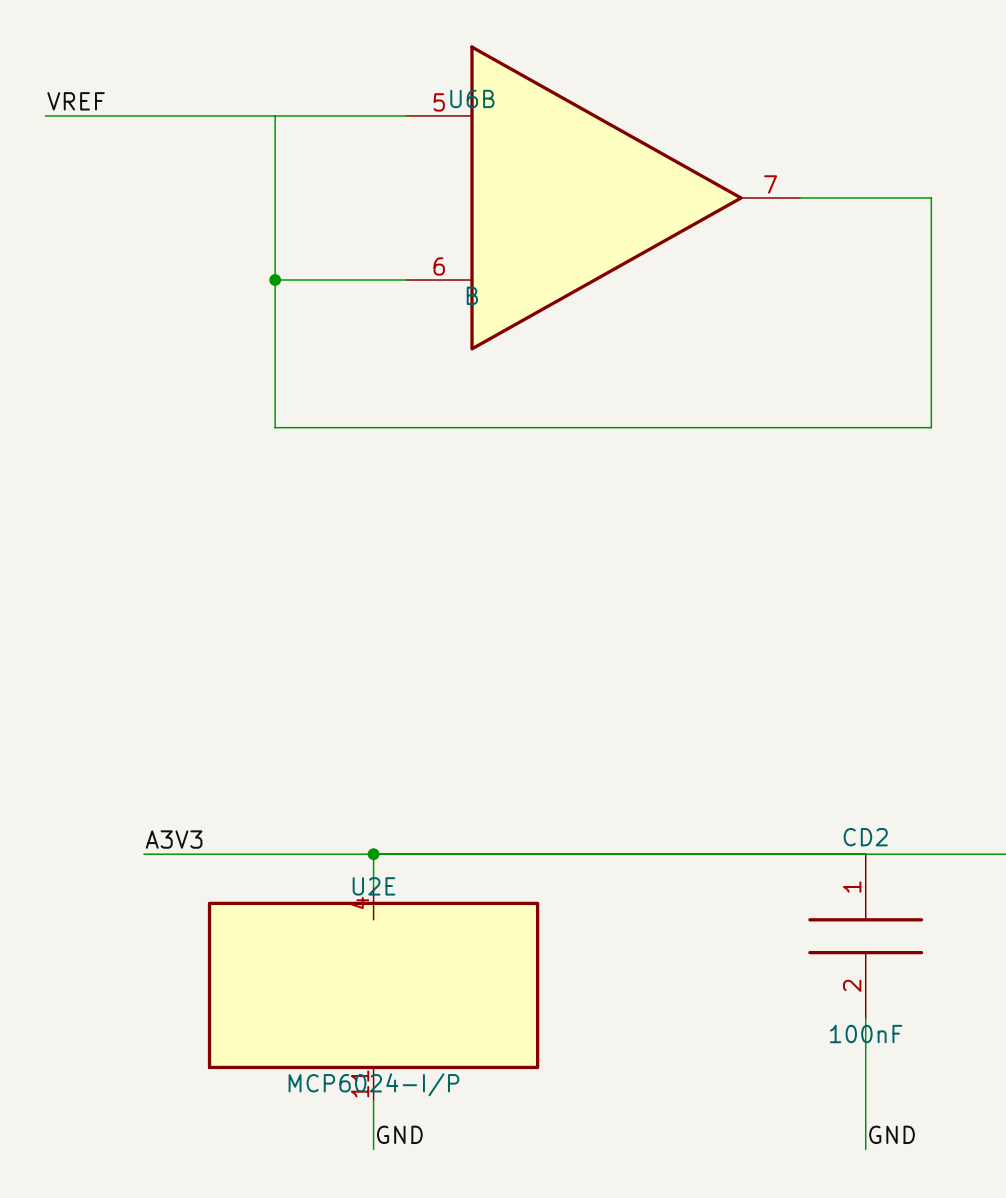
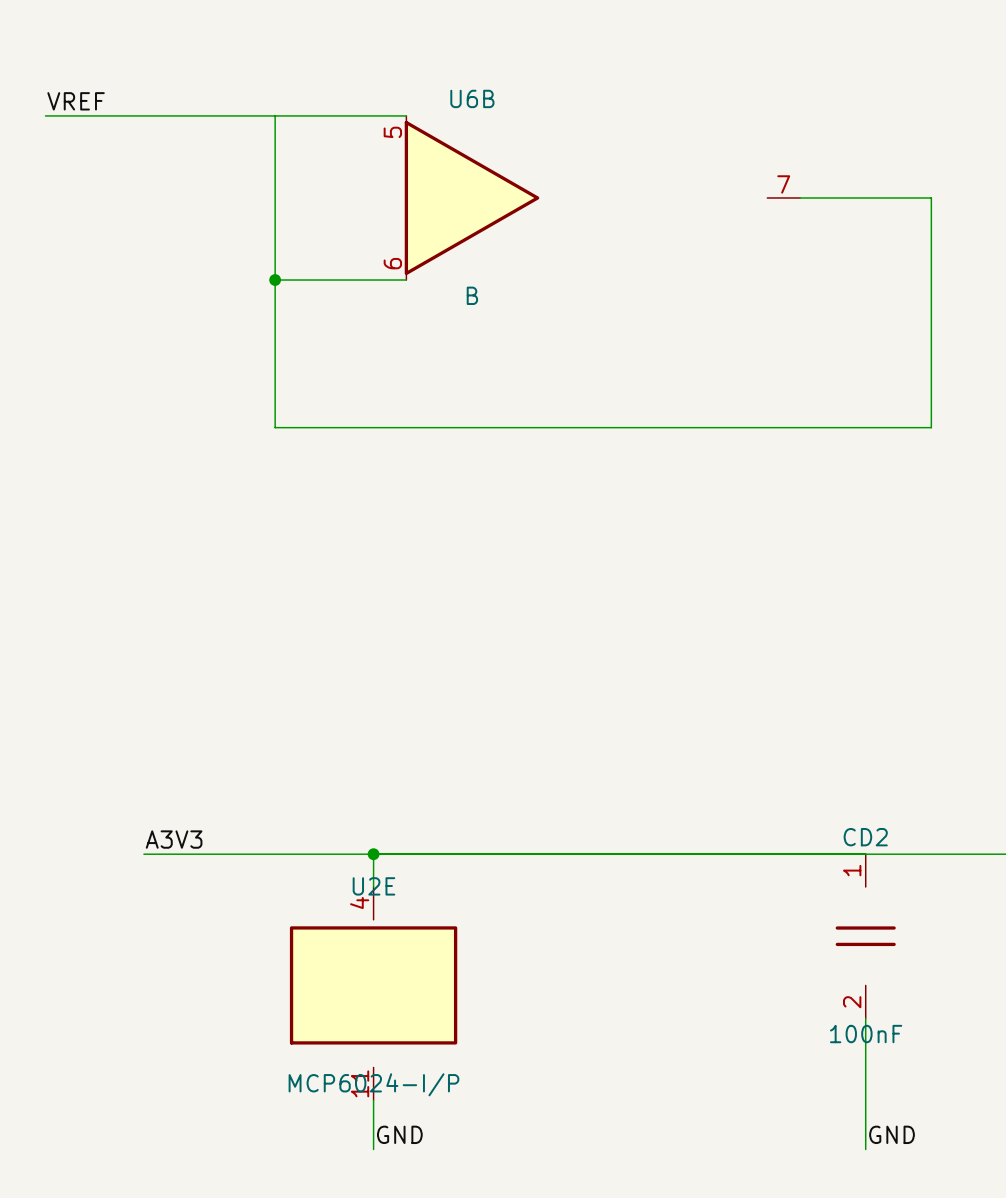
U6B symbol: [406, 45, 801, 351] -> [404, 115, 801, 281]
CD2 symbol: [808, 854, 924, 1019] -> [835, 854, 896, 1019]
U2E symbol: [207, 887, 540, 1101] -> [289, 887, 458, 1101]

